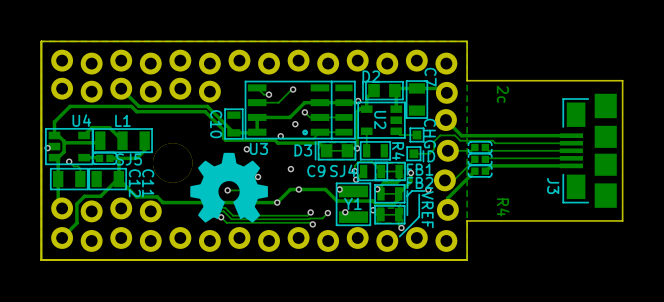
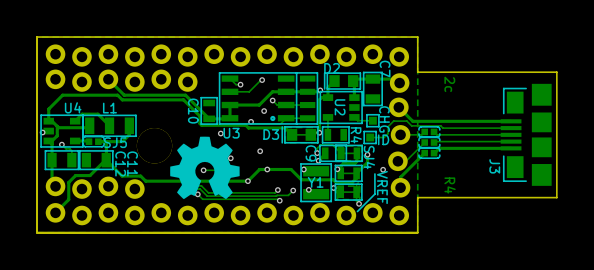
FB1 name: FB1 (420, 169) -> none
SJ4 name rotation: 0° (343, 170) -> 90° clockwise (369, 157)
SJ4 name position: SJ4 (343, 170) -> SJ4 (369, 157)
C9 name rotation: 0° (316, 171) -> 90° clockwise (311, 153)
C9 name position: C9 (316, 171) -> C9 (311, 153)
FB2 name: FB2 (420, 182) -> none
line: (407, 190) (407, 215) -> none
line: (424, 190) (412, 190) (407, 195) -> none

